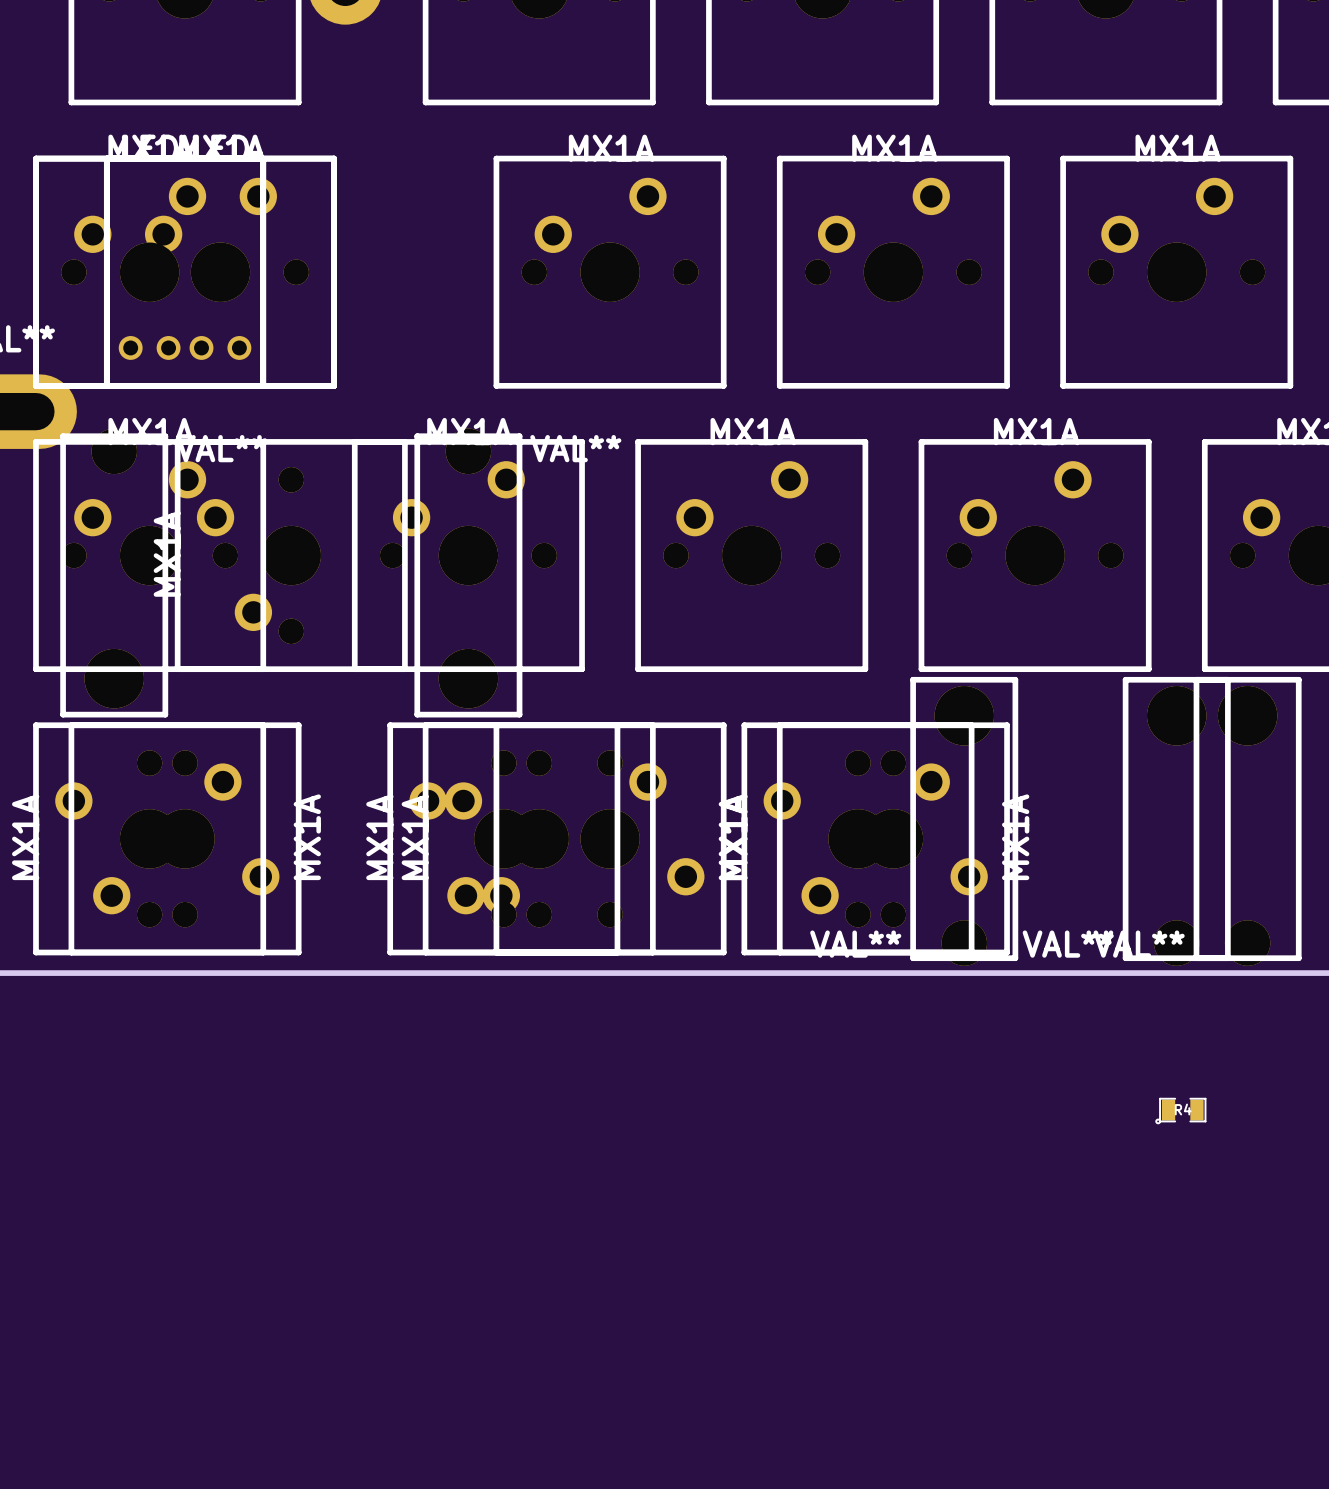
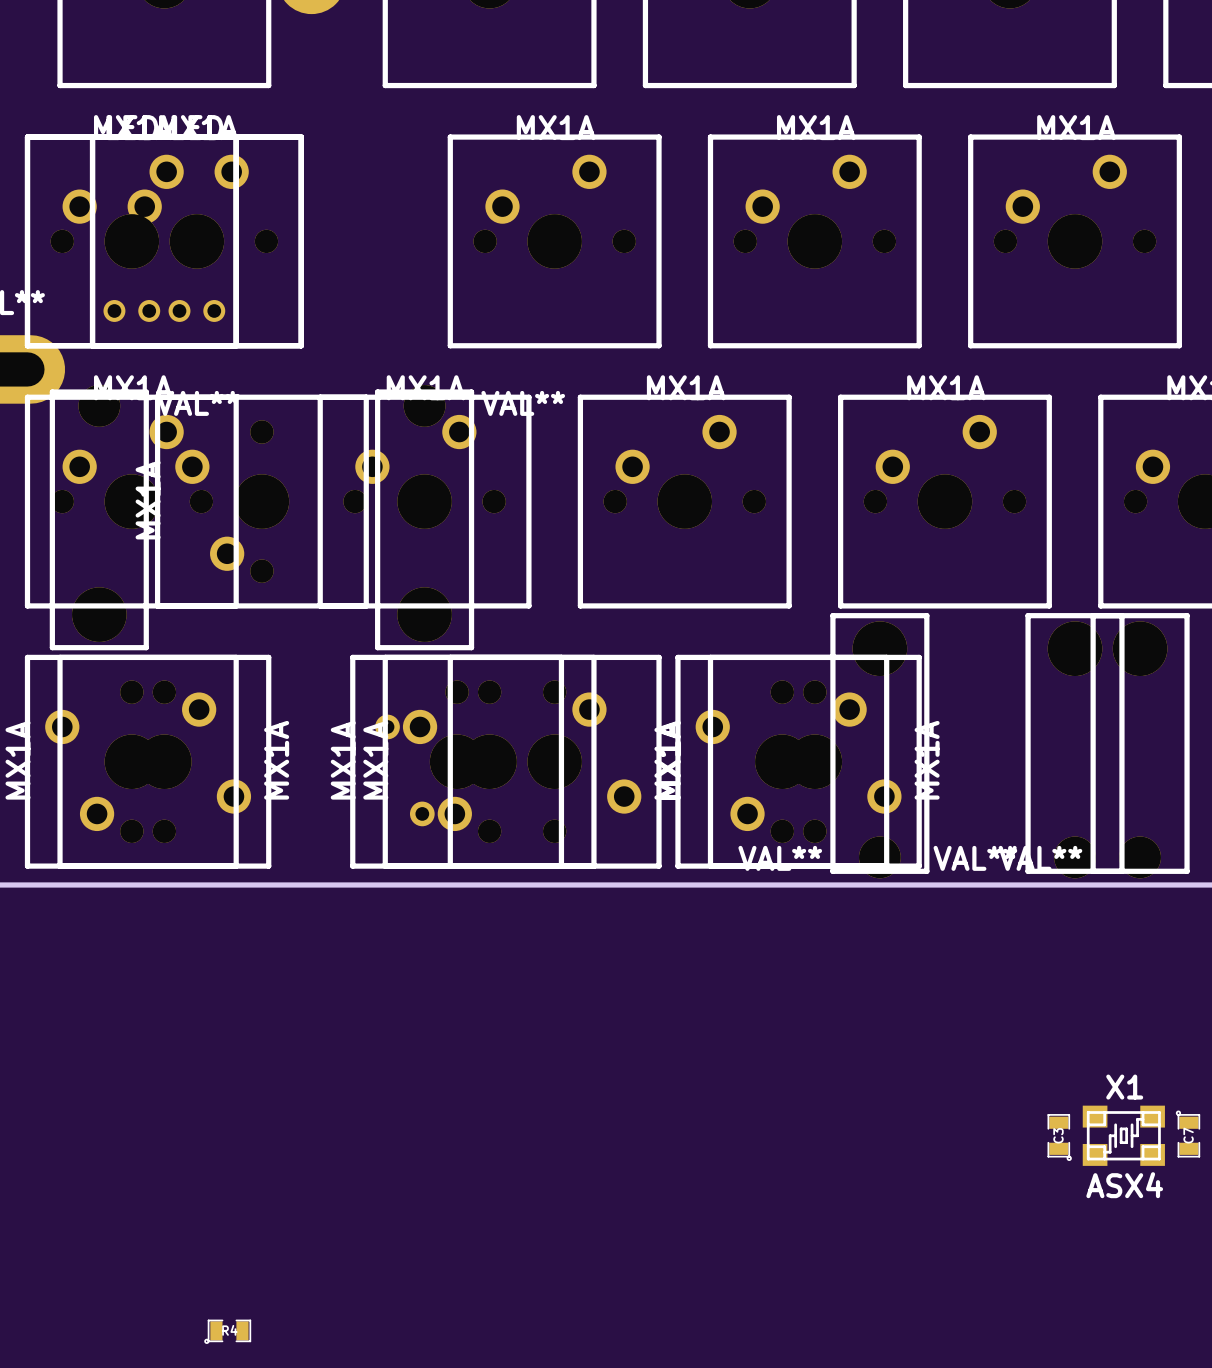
part footprint: [387, 722, 621, 956] -> [350, 654, 565, 869]
R4 position: (1180, 1111) -> (227, 1331)
C7: none -> (1188, 1134)
X1: none -> ASX4 (1123, 1135)
C3: none -> (1059, 1137)

